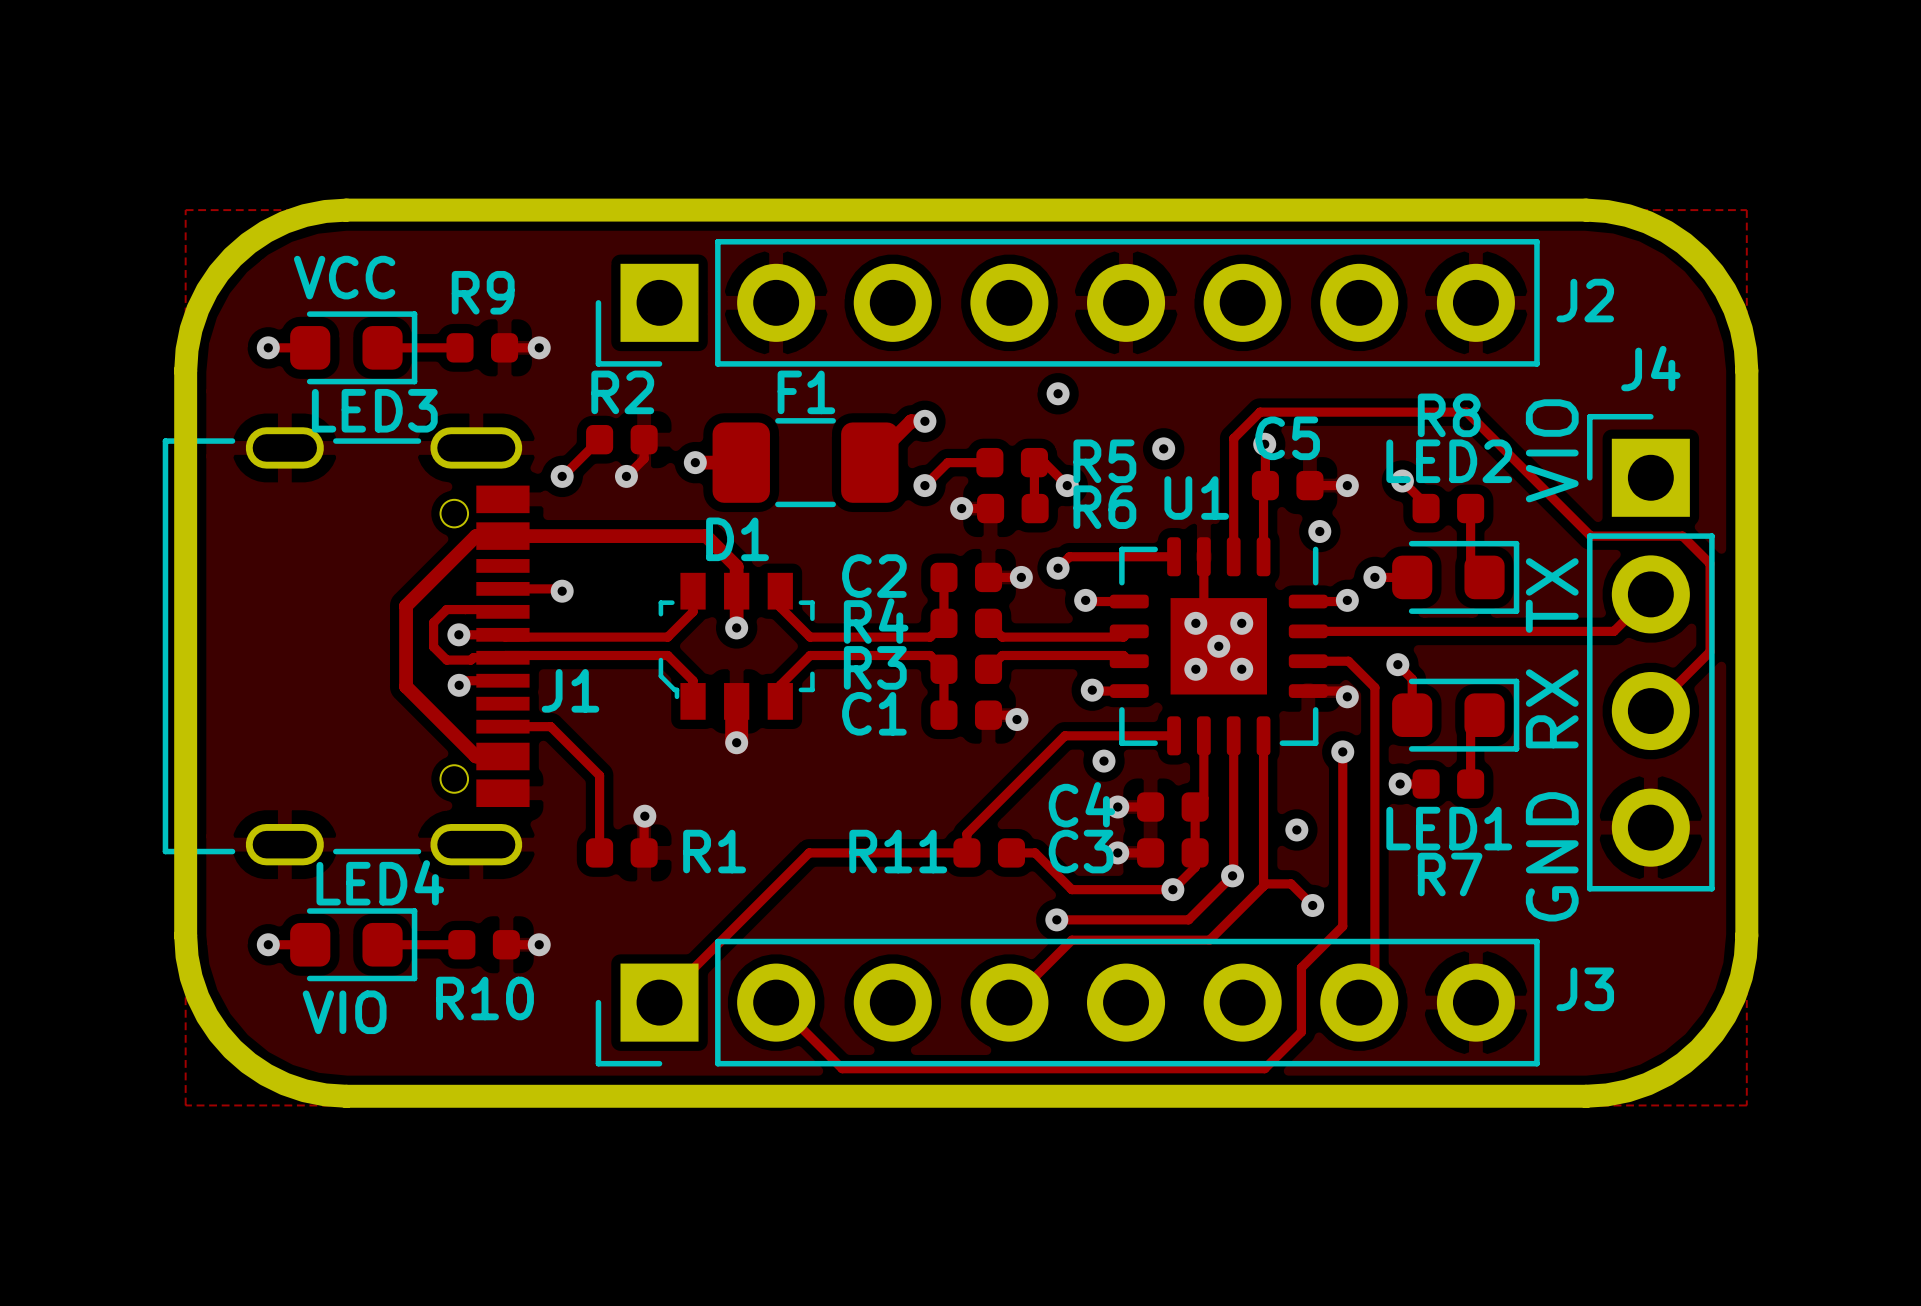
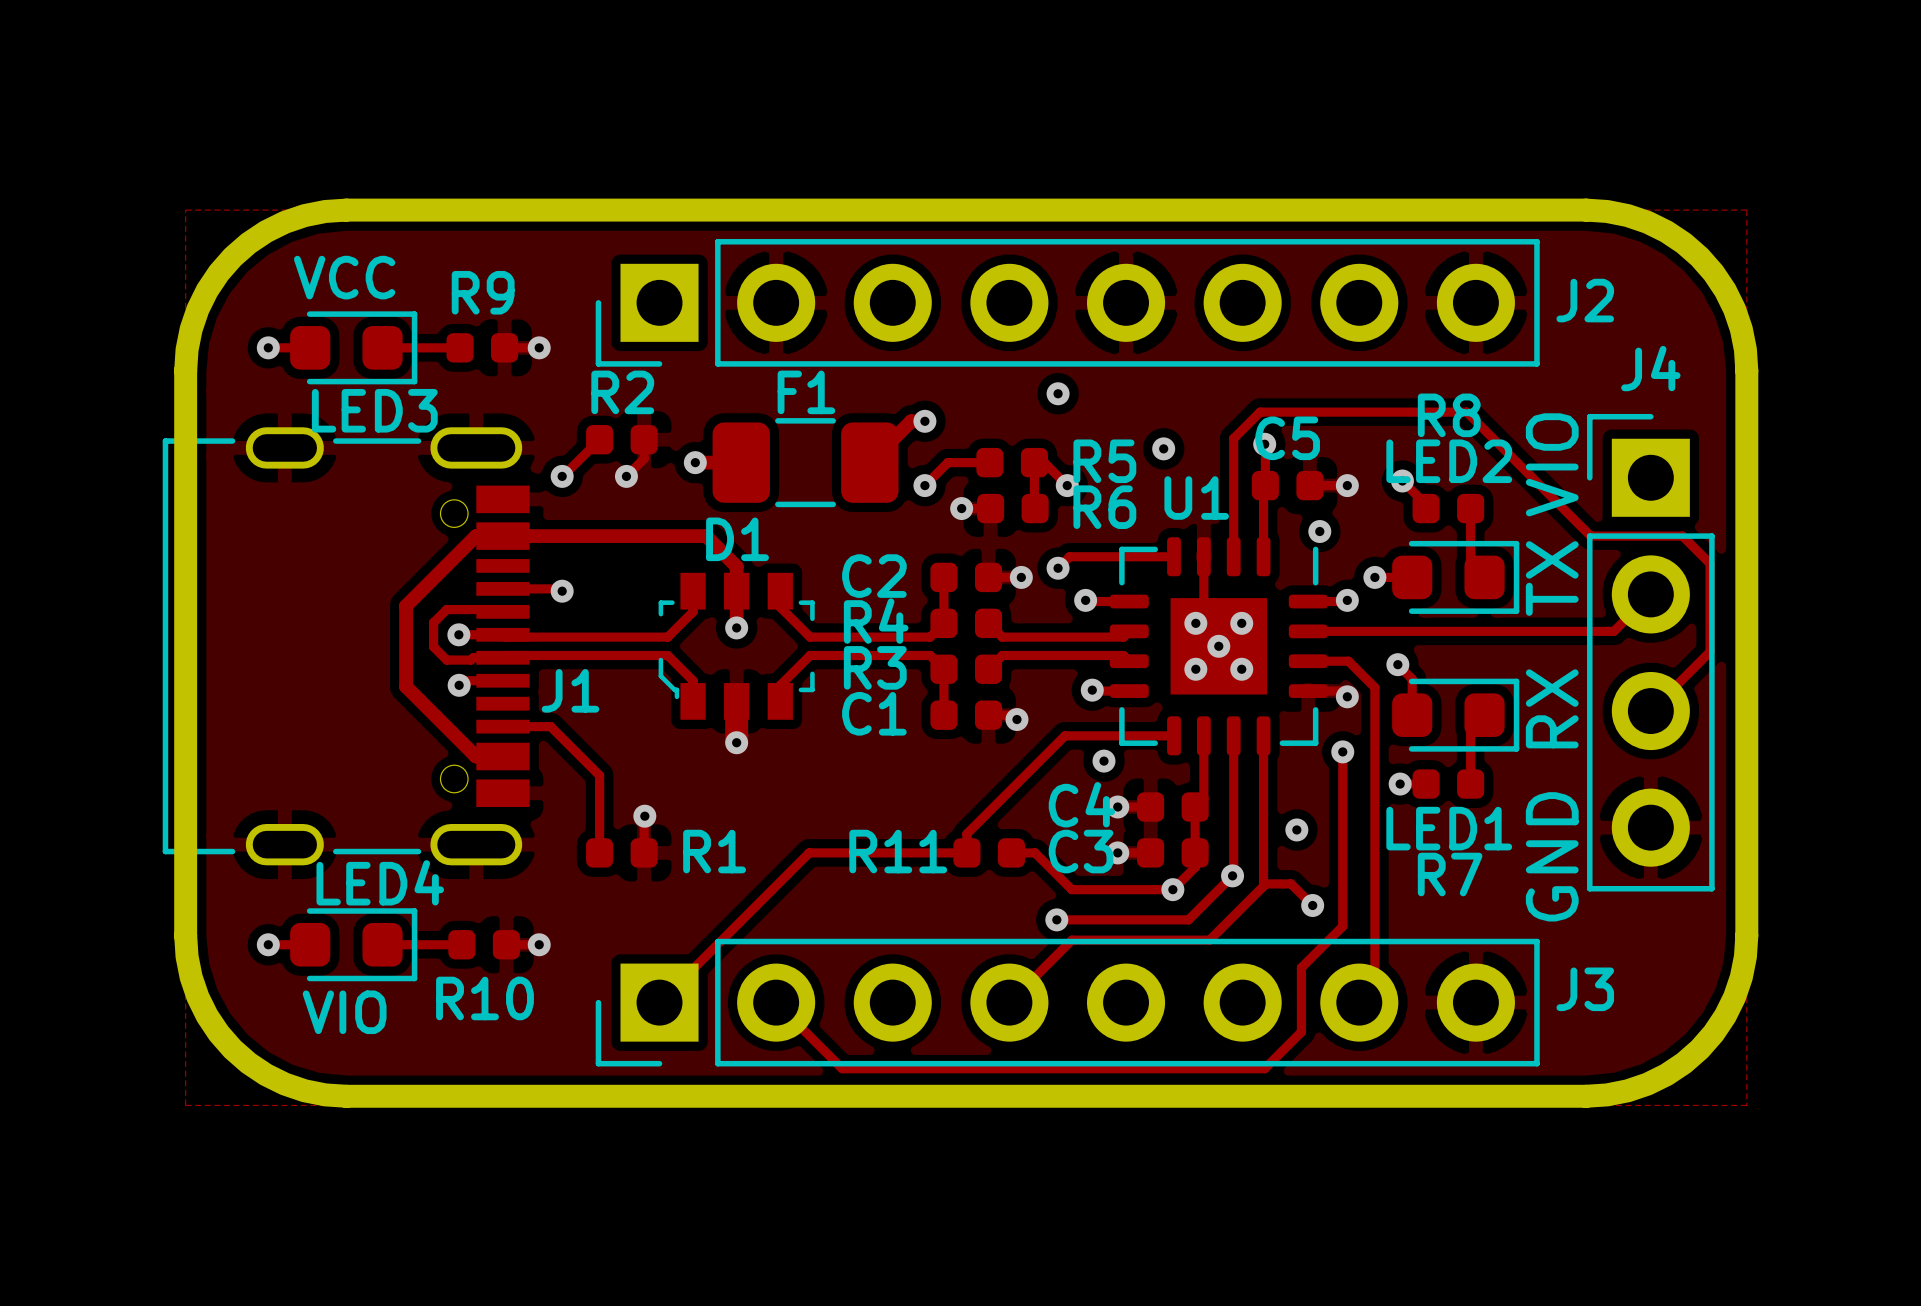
text position: VIO (1552, 450) -> VIO (1552, 464)
text position: TX (1552, 595) -> TX (1552, 578)

